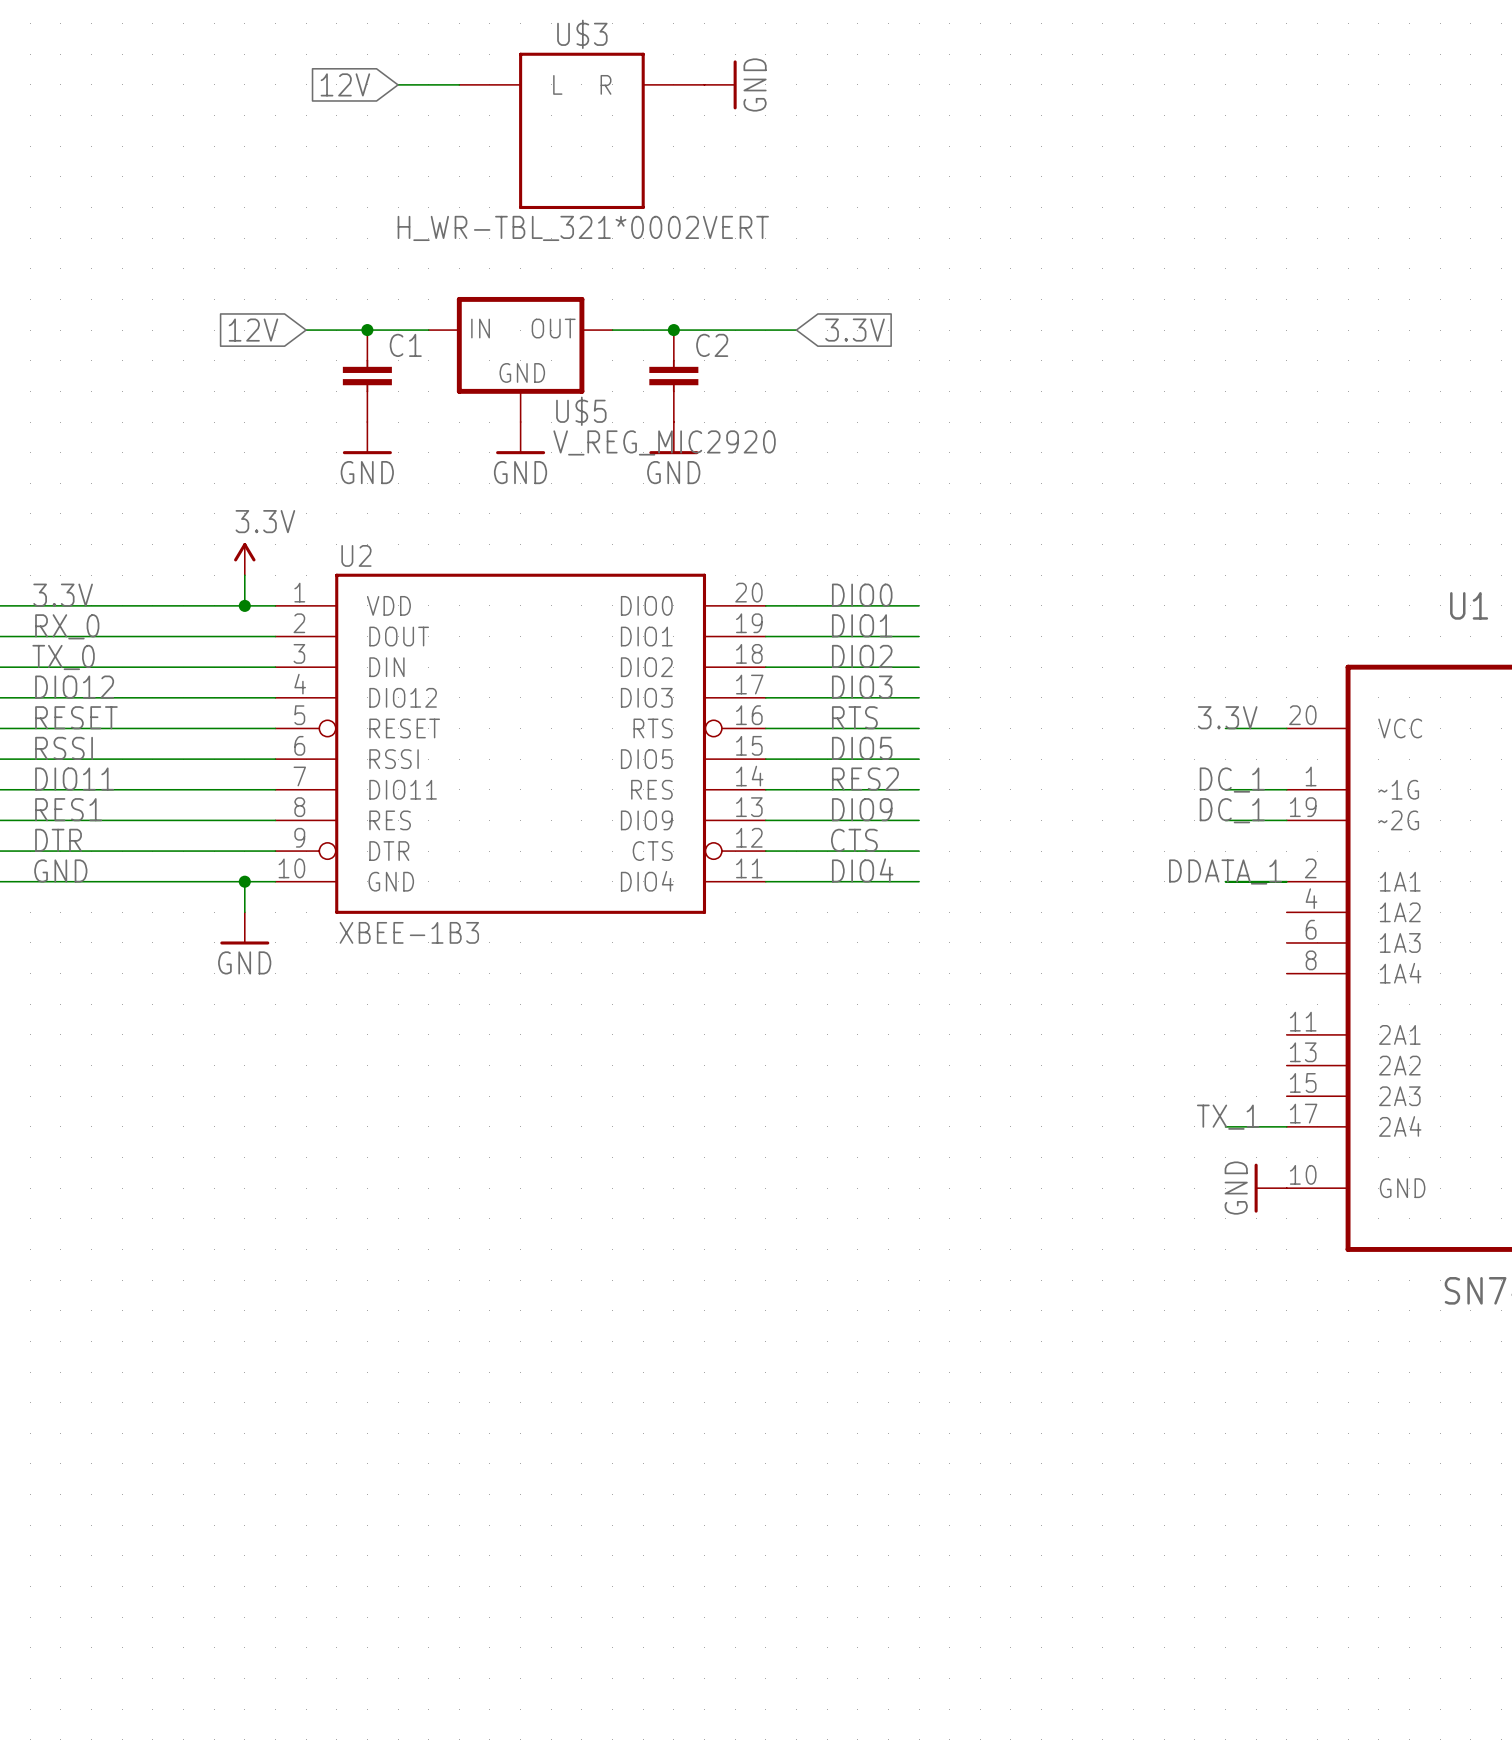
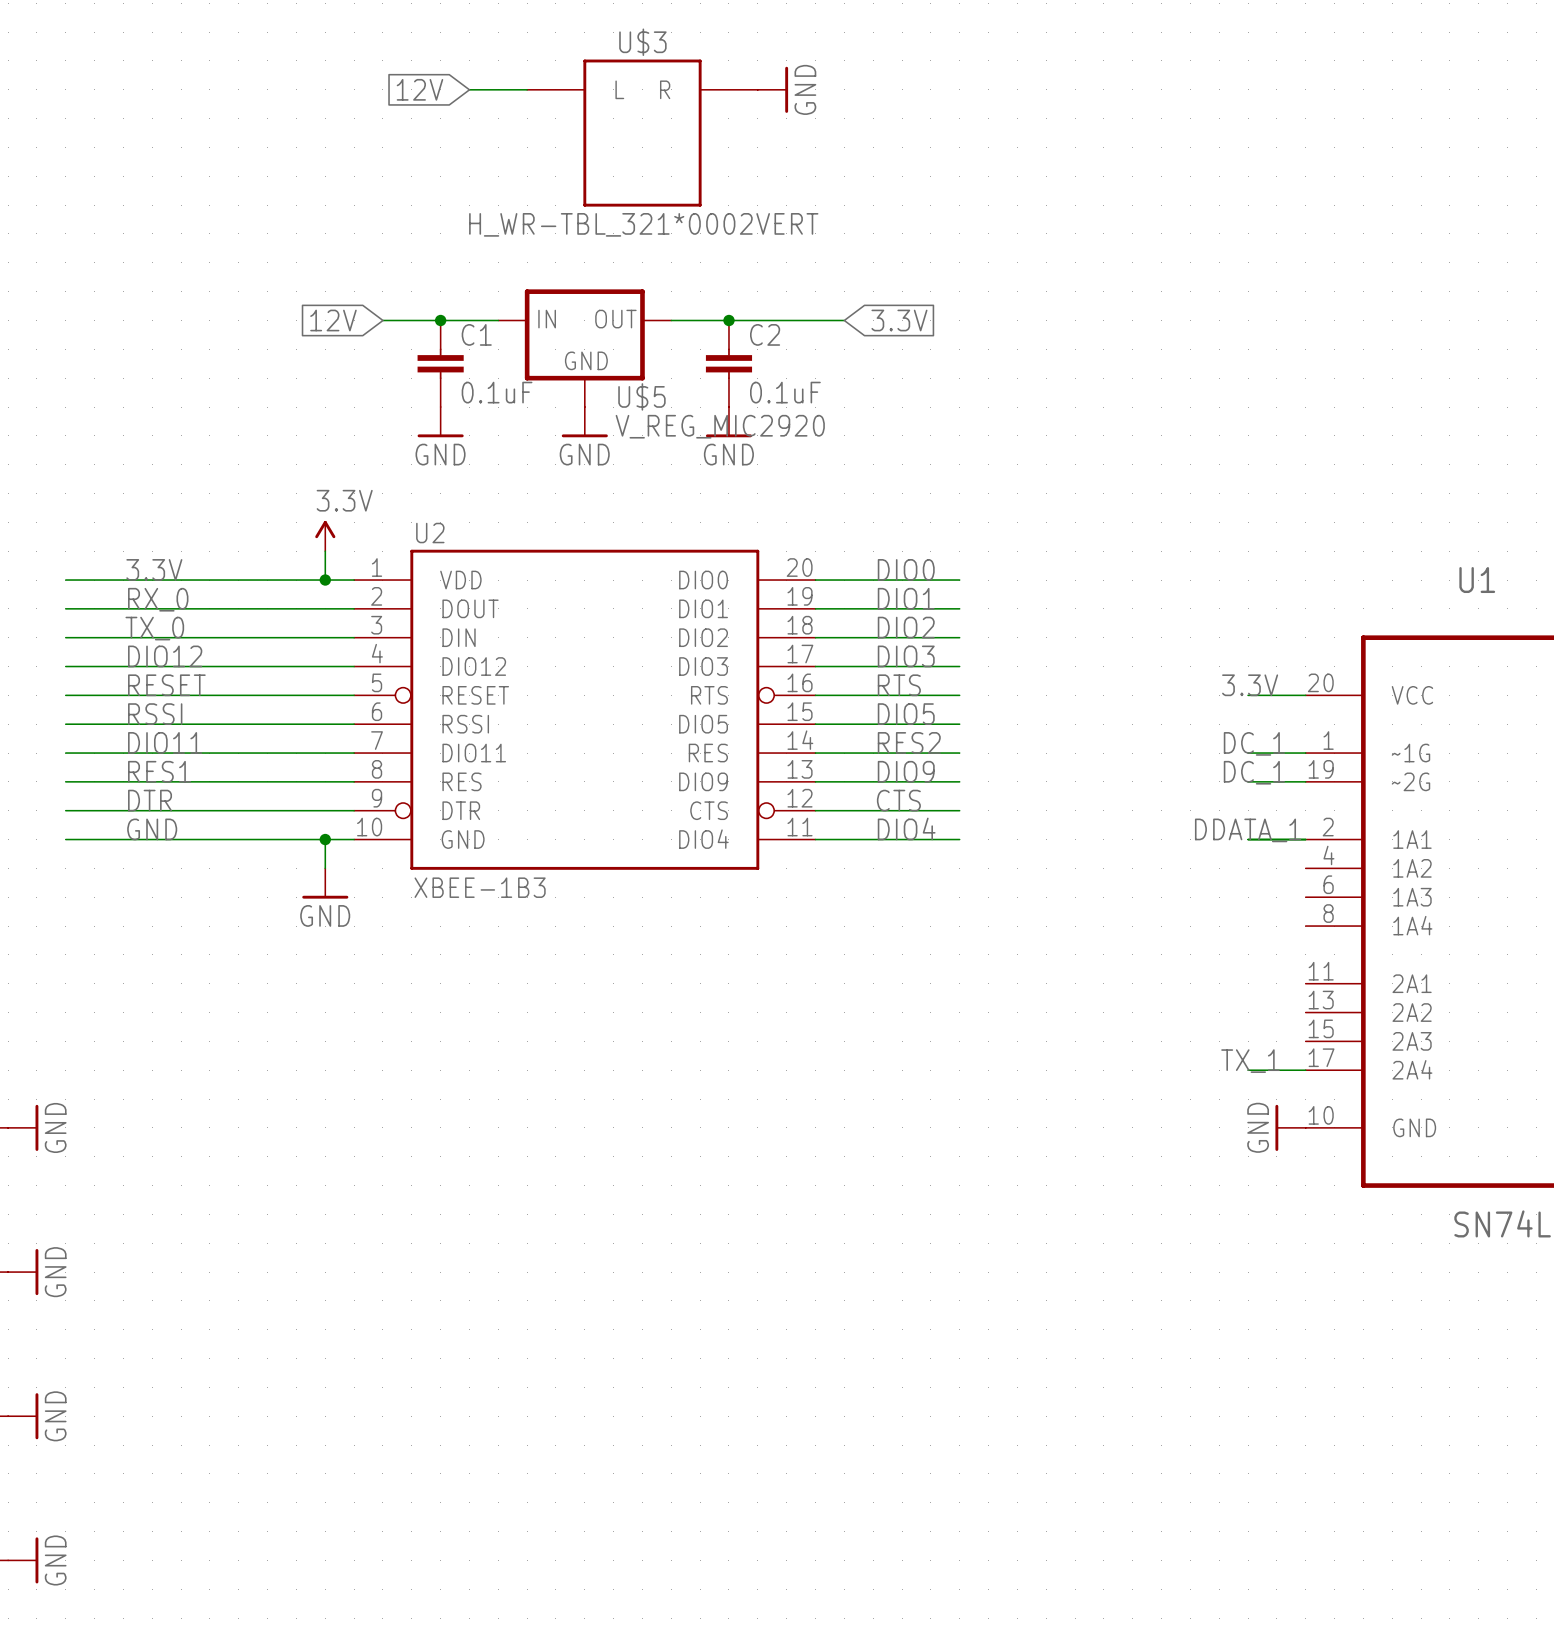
C1 value: none -> 0.1uF (497, 392)
C2 value: none -> 0.1uF (785, 392)

